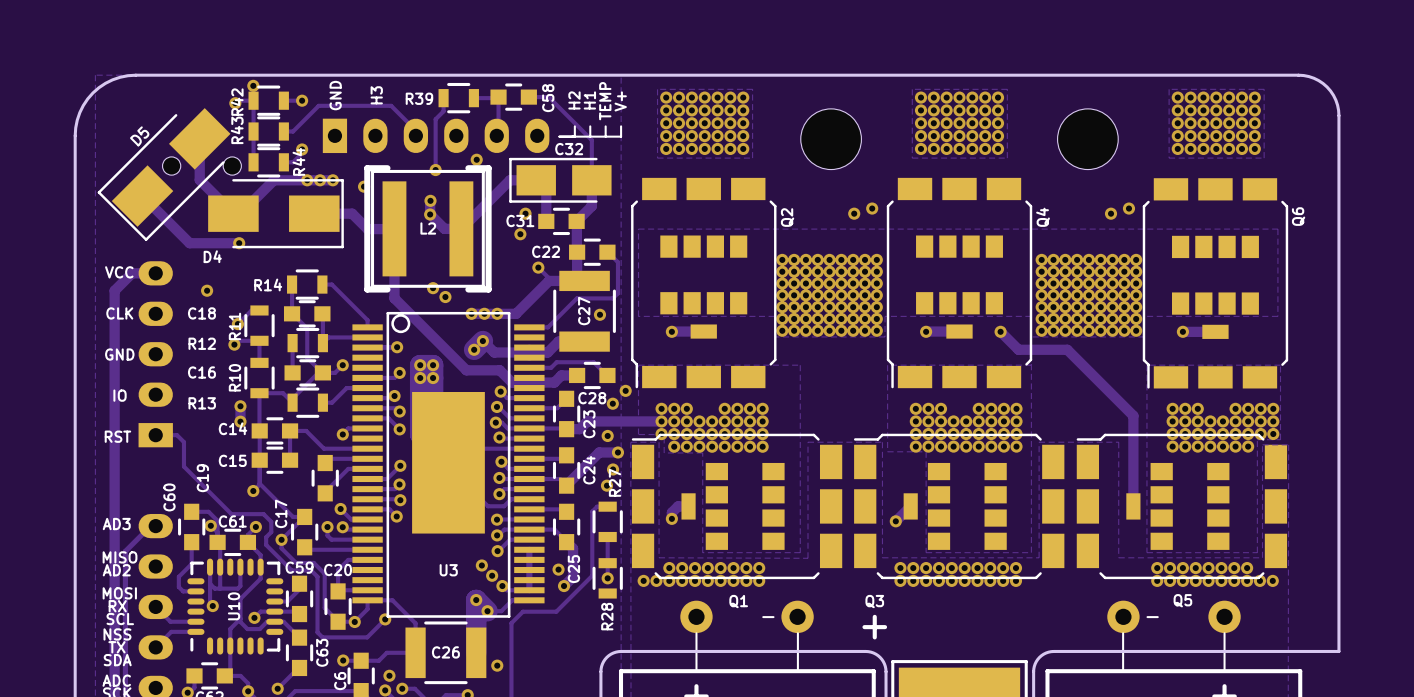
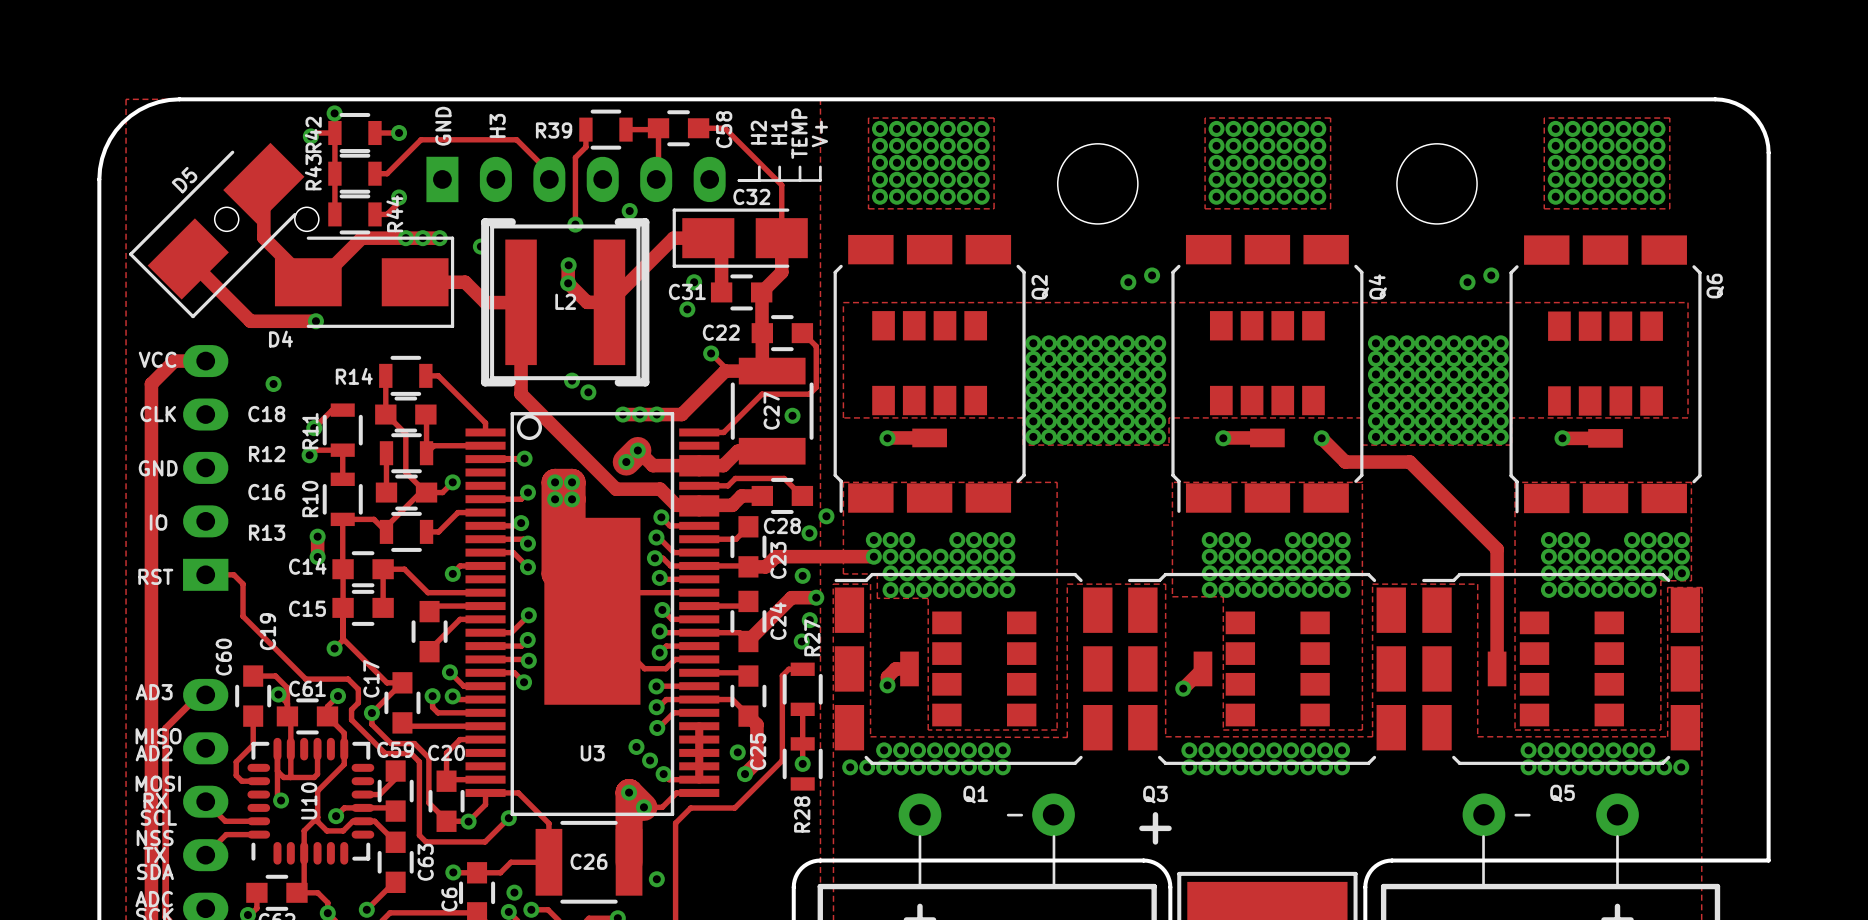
via: (661, 434) -> none

